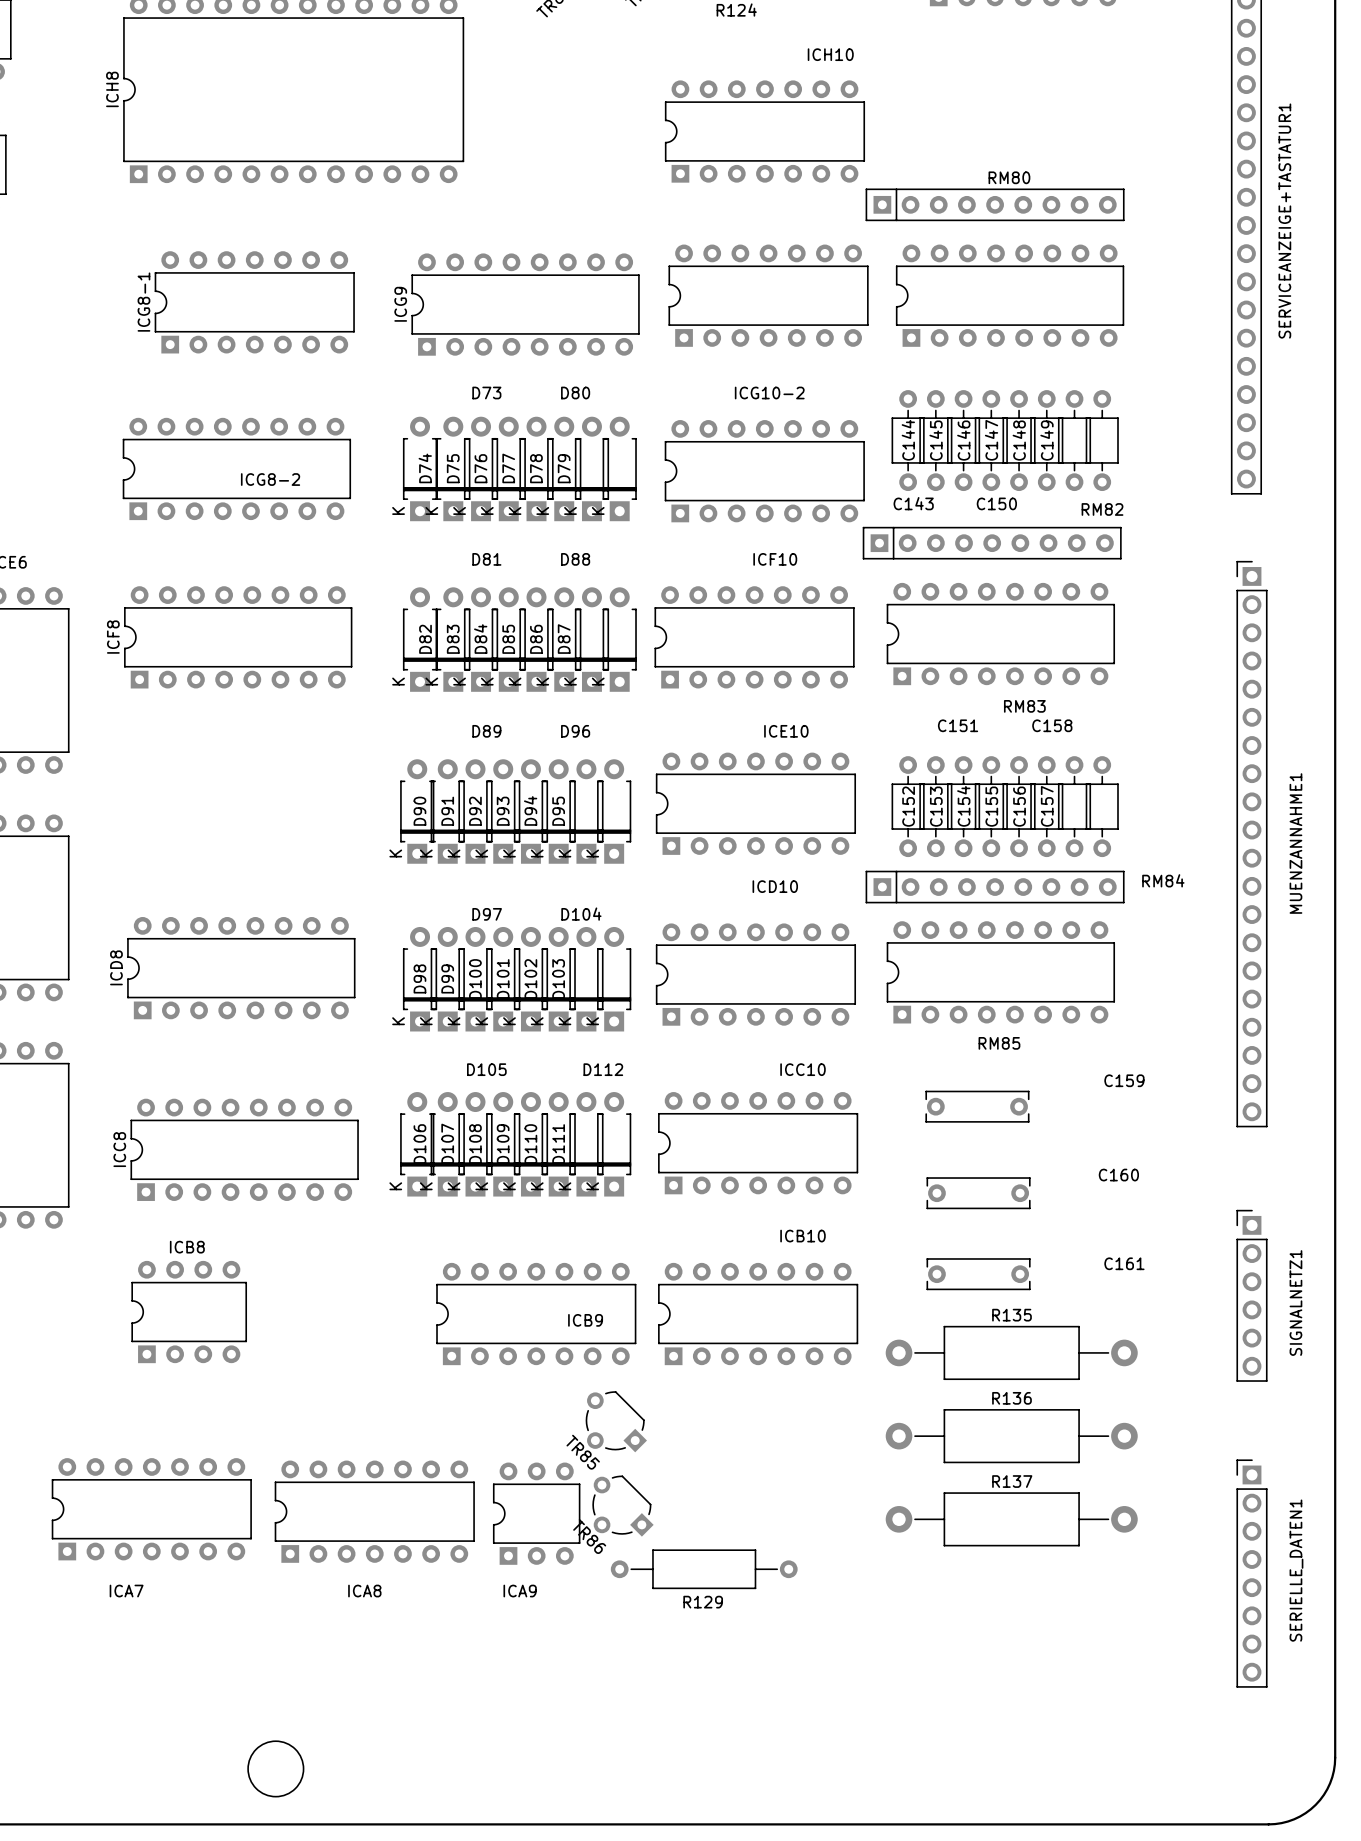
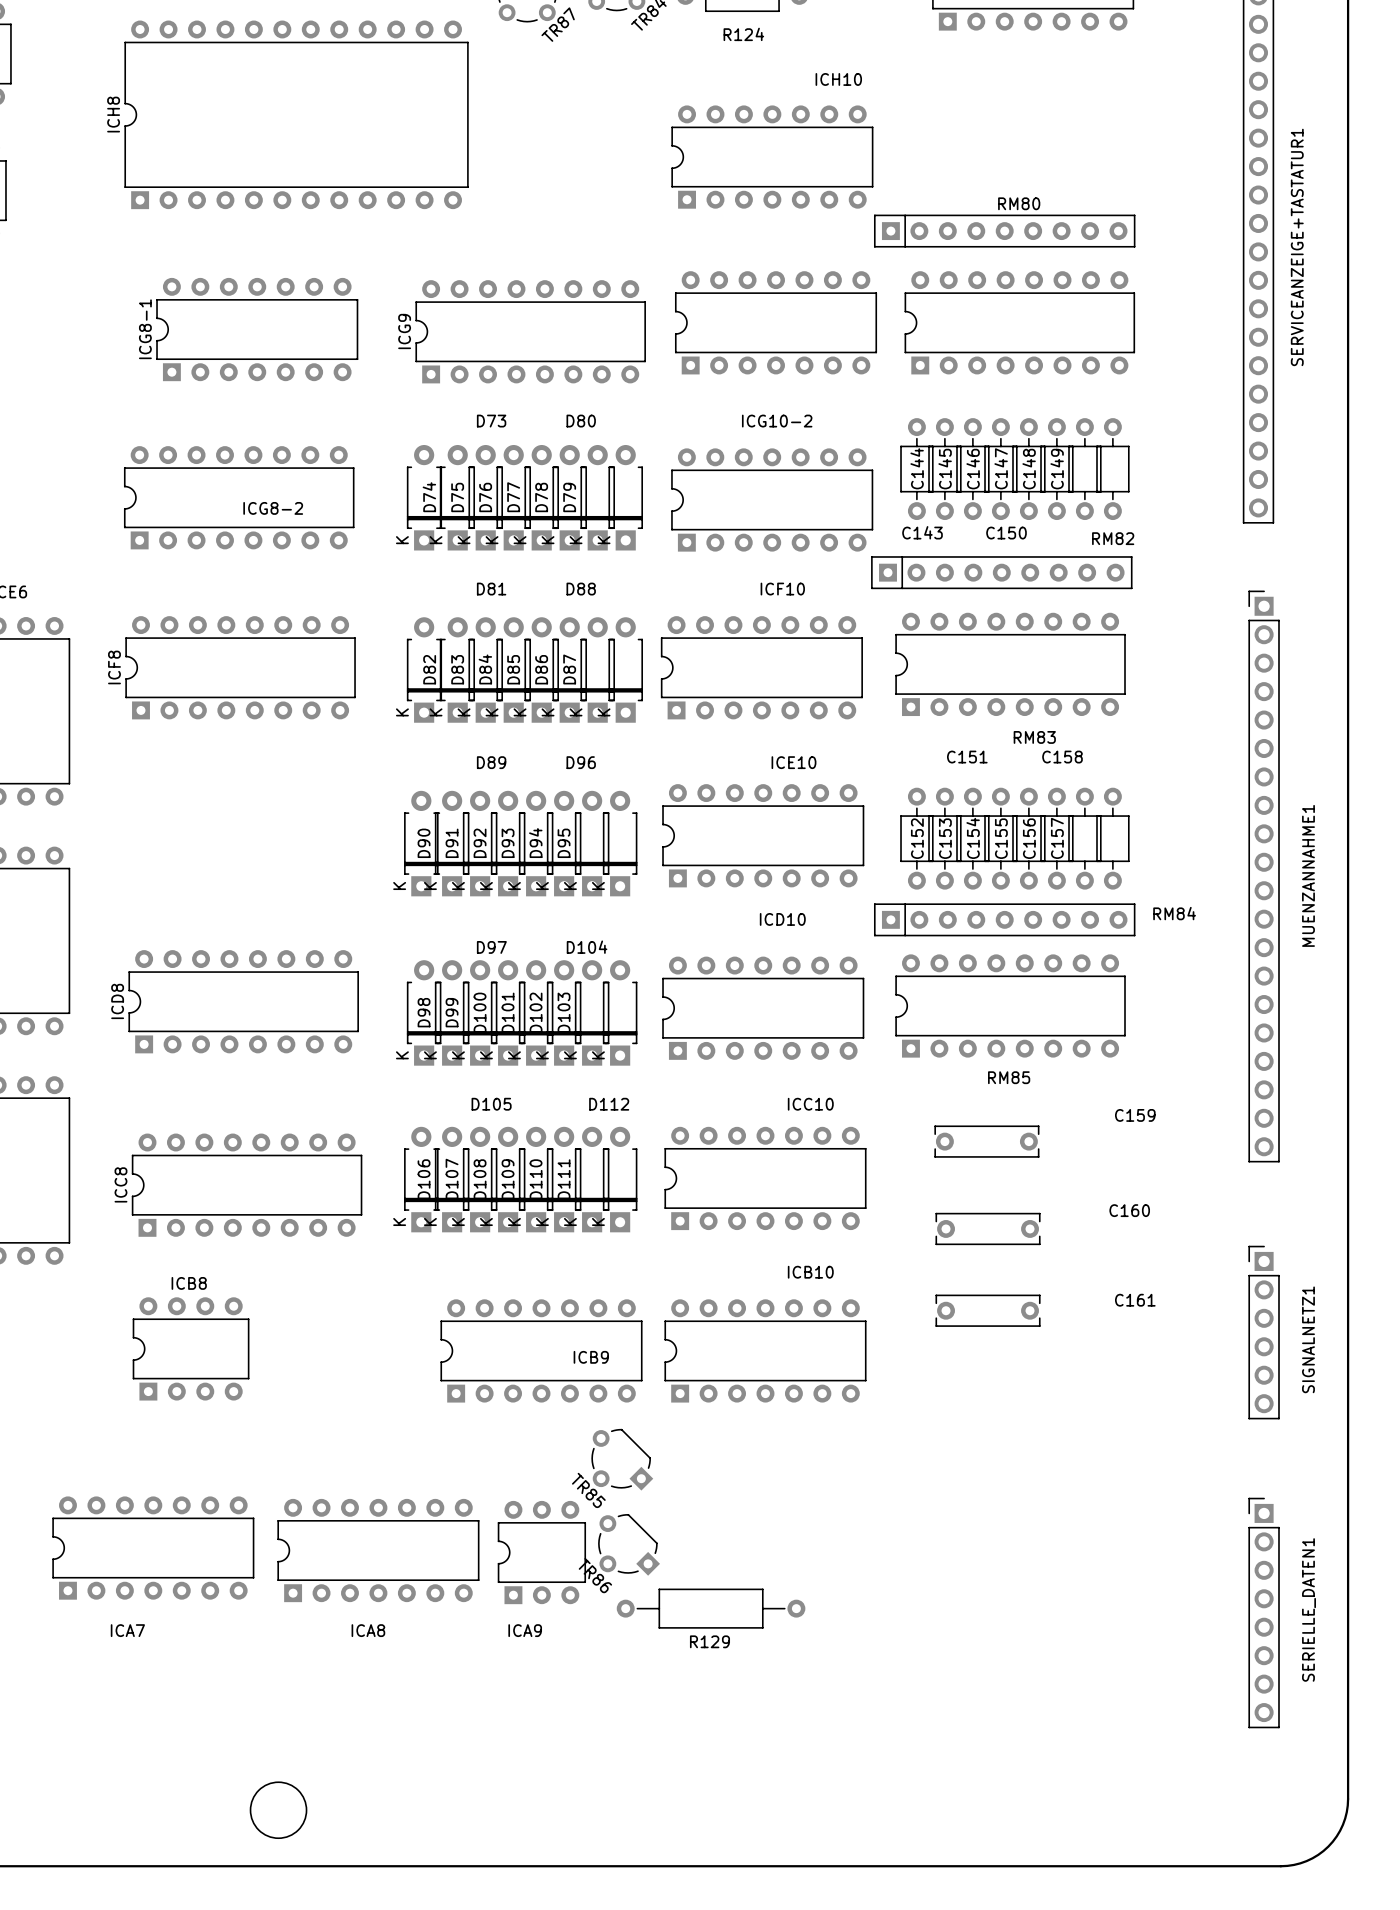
R135: (1011, 1352) -> none
R136: (1011, 1436) -> none
R137: (1011, 1519) -> none

